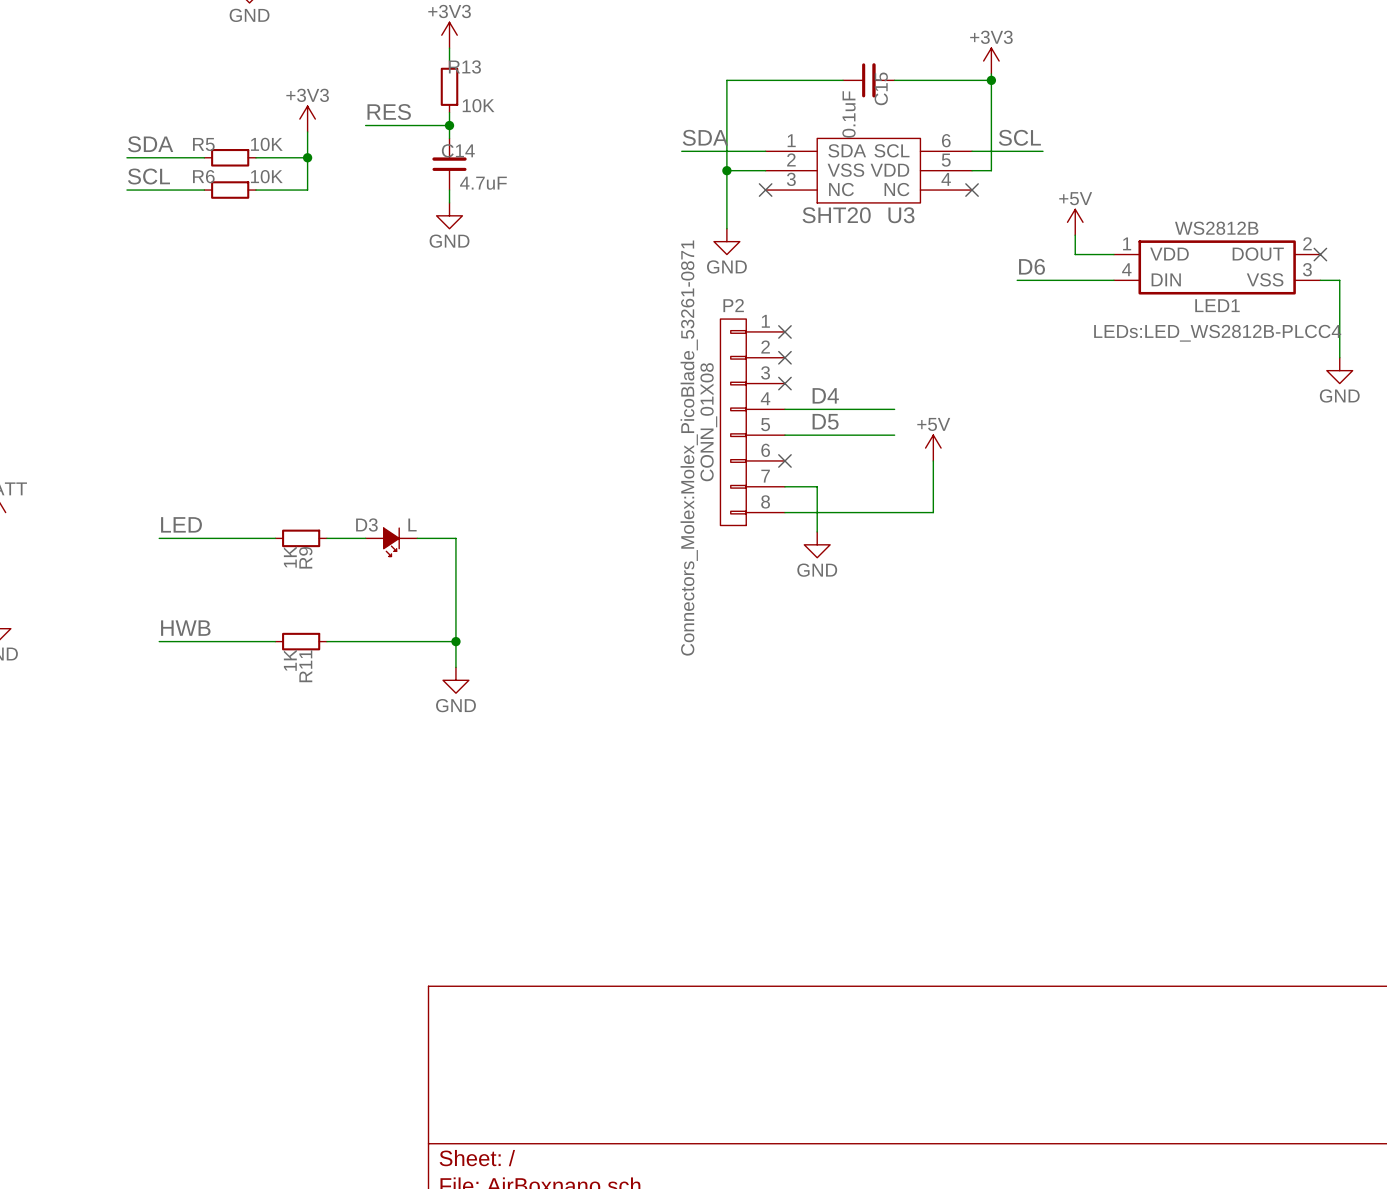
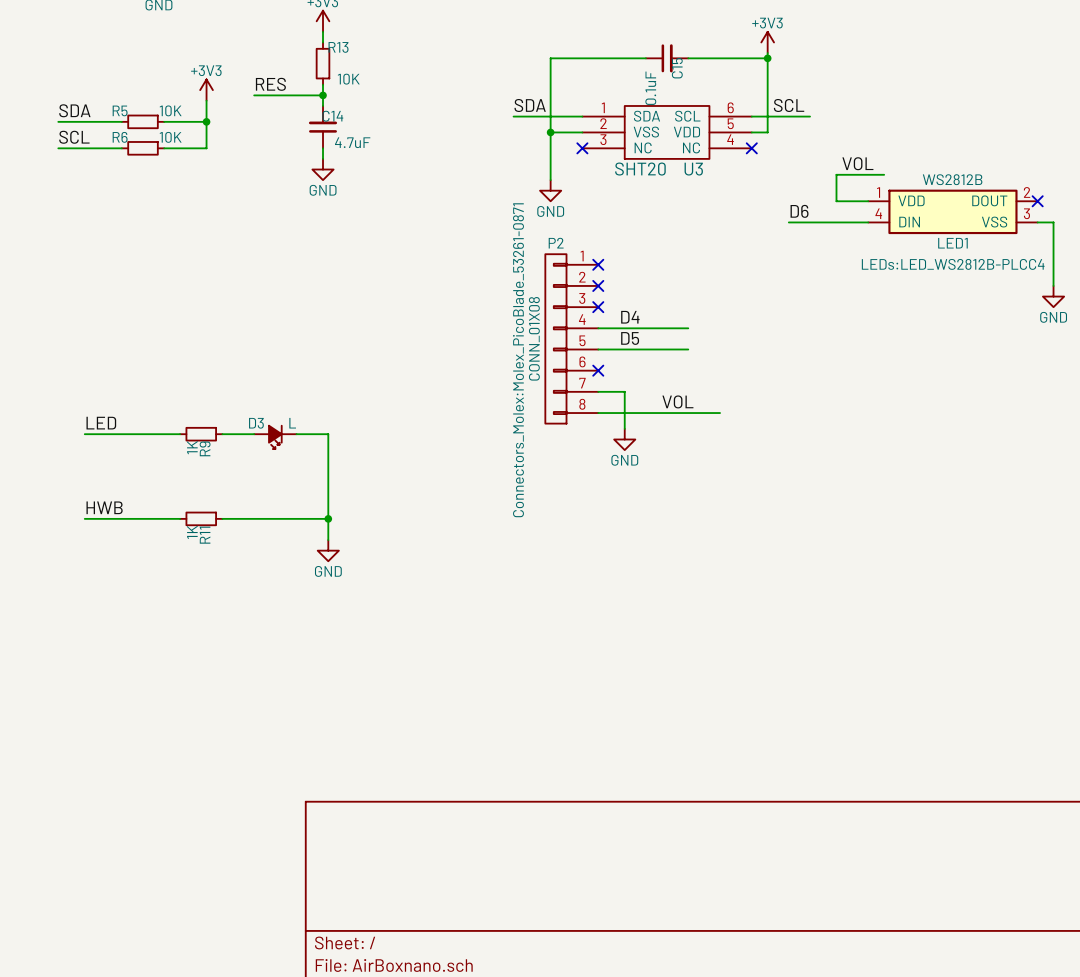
label: none -> VOL (857, 163)
power symbol: +5V (1075, 222) -> none
wire: none -> (884, 174) (836, 174) (836, 185)
power symbol: +5V (933, 448) -> none
wire: (933, 460) (933, 512) -> none
label: none -> VOL (677, 401)

